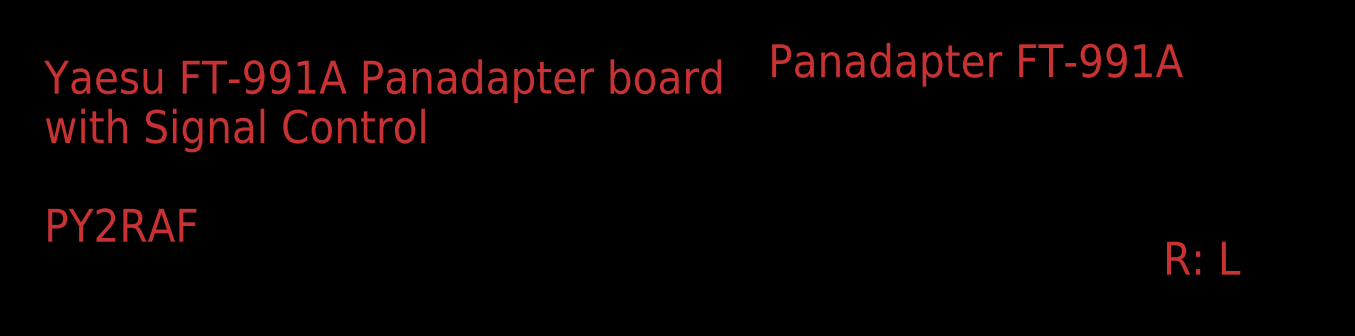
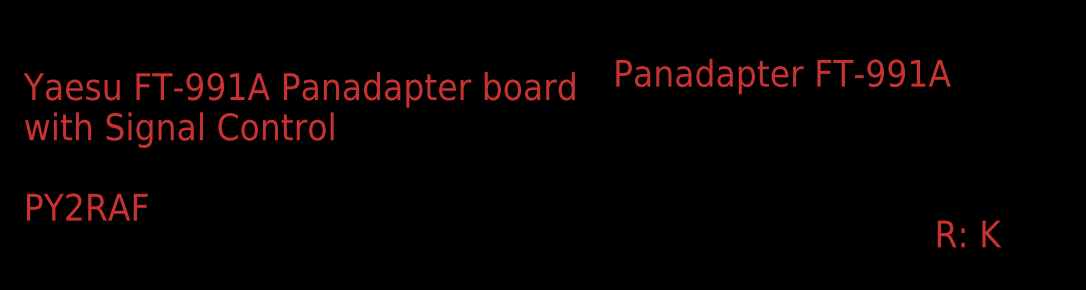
text: R: L (1203, 258) -> R: K (969, 234)

